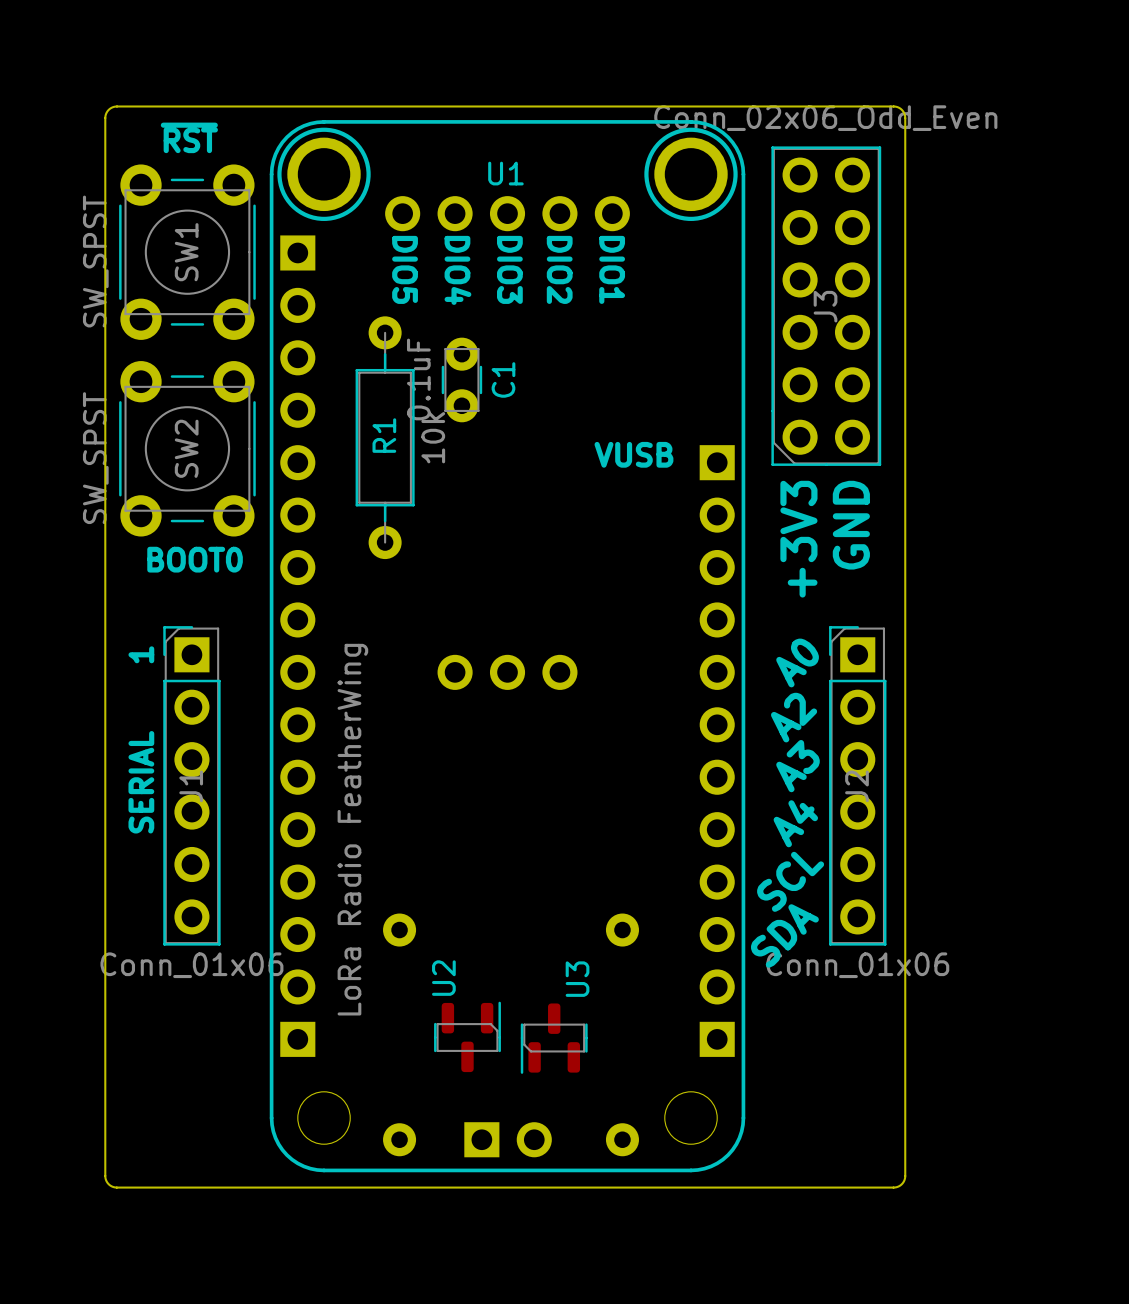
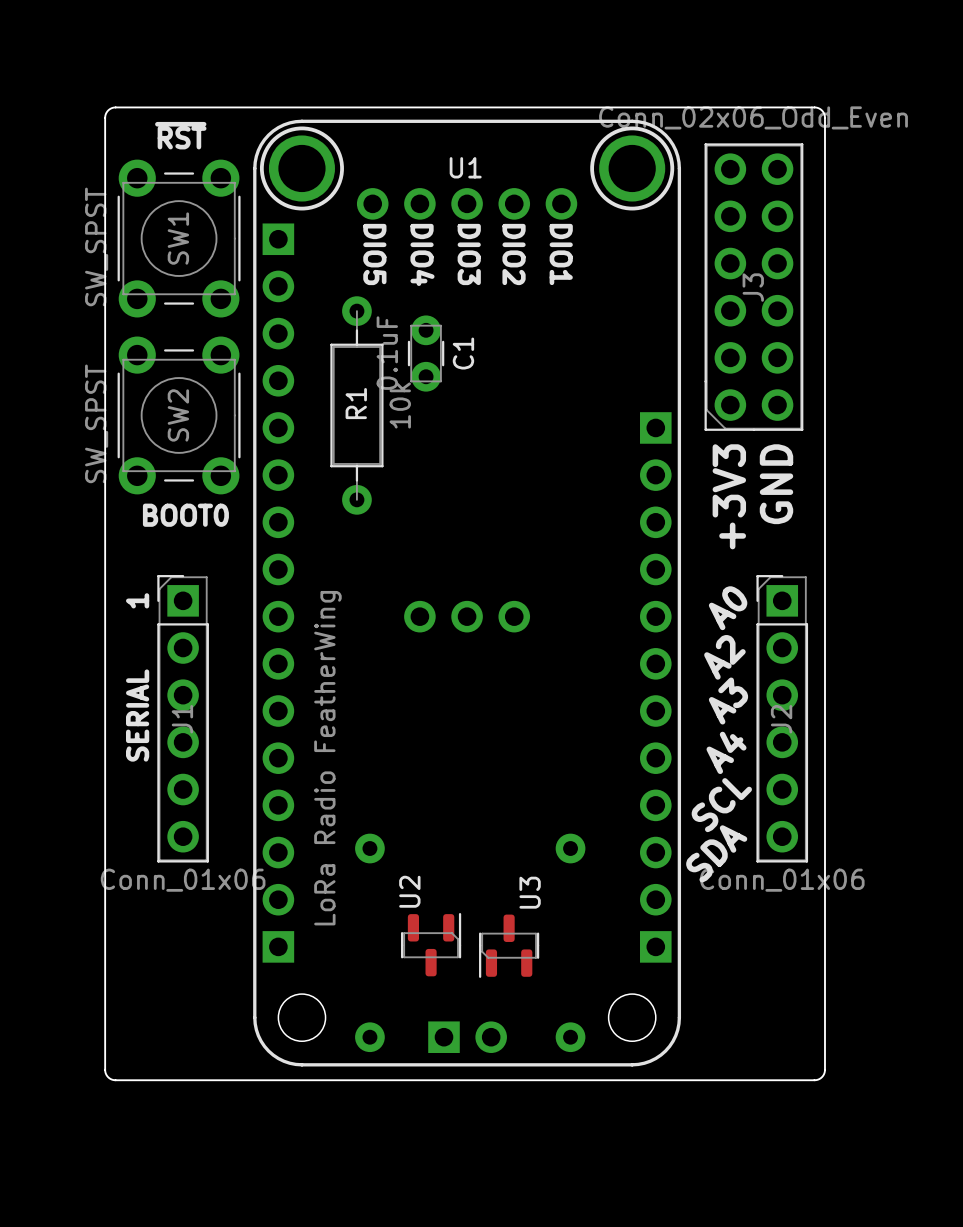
text: VUSB (633, 454) -> none

